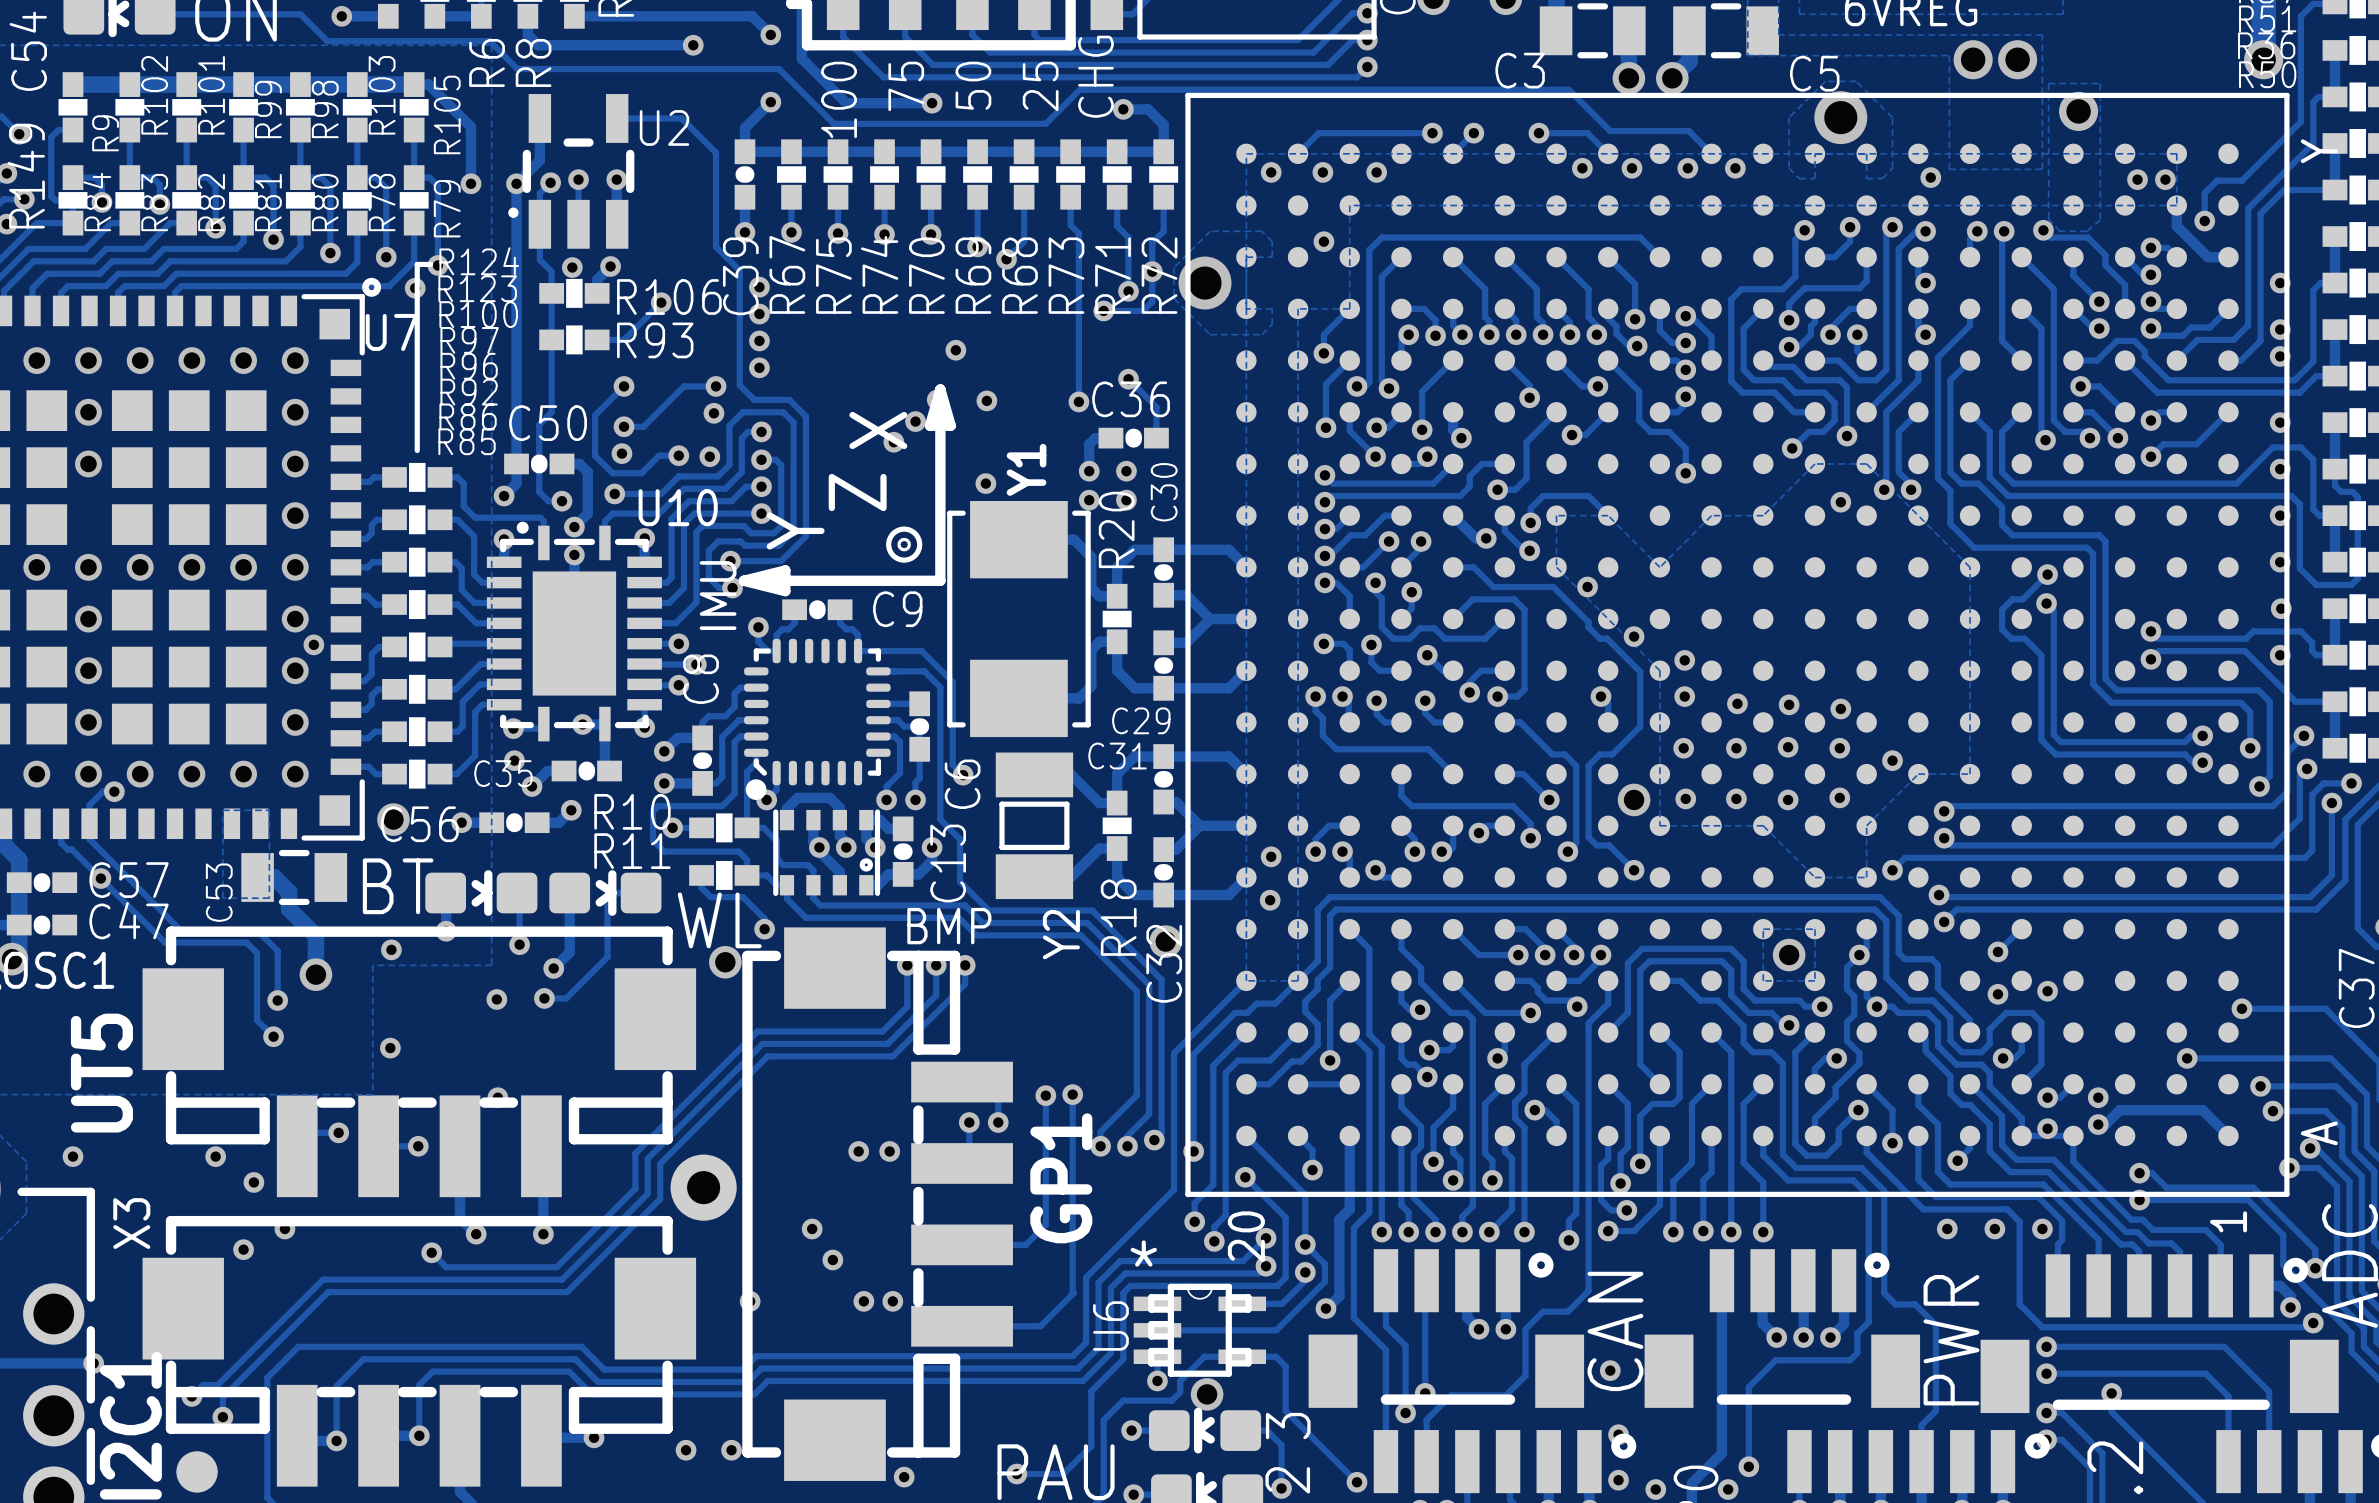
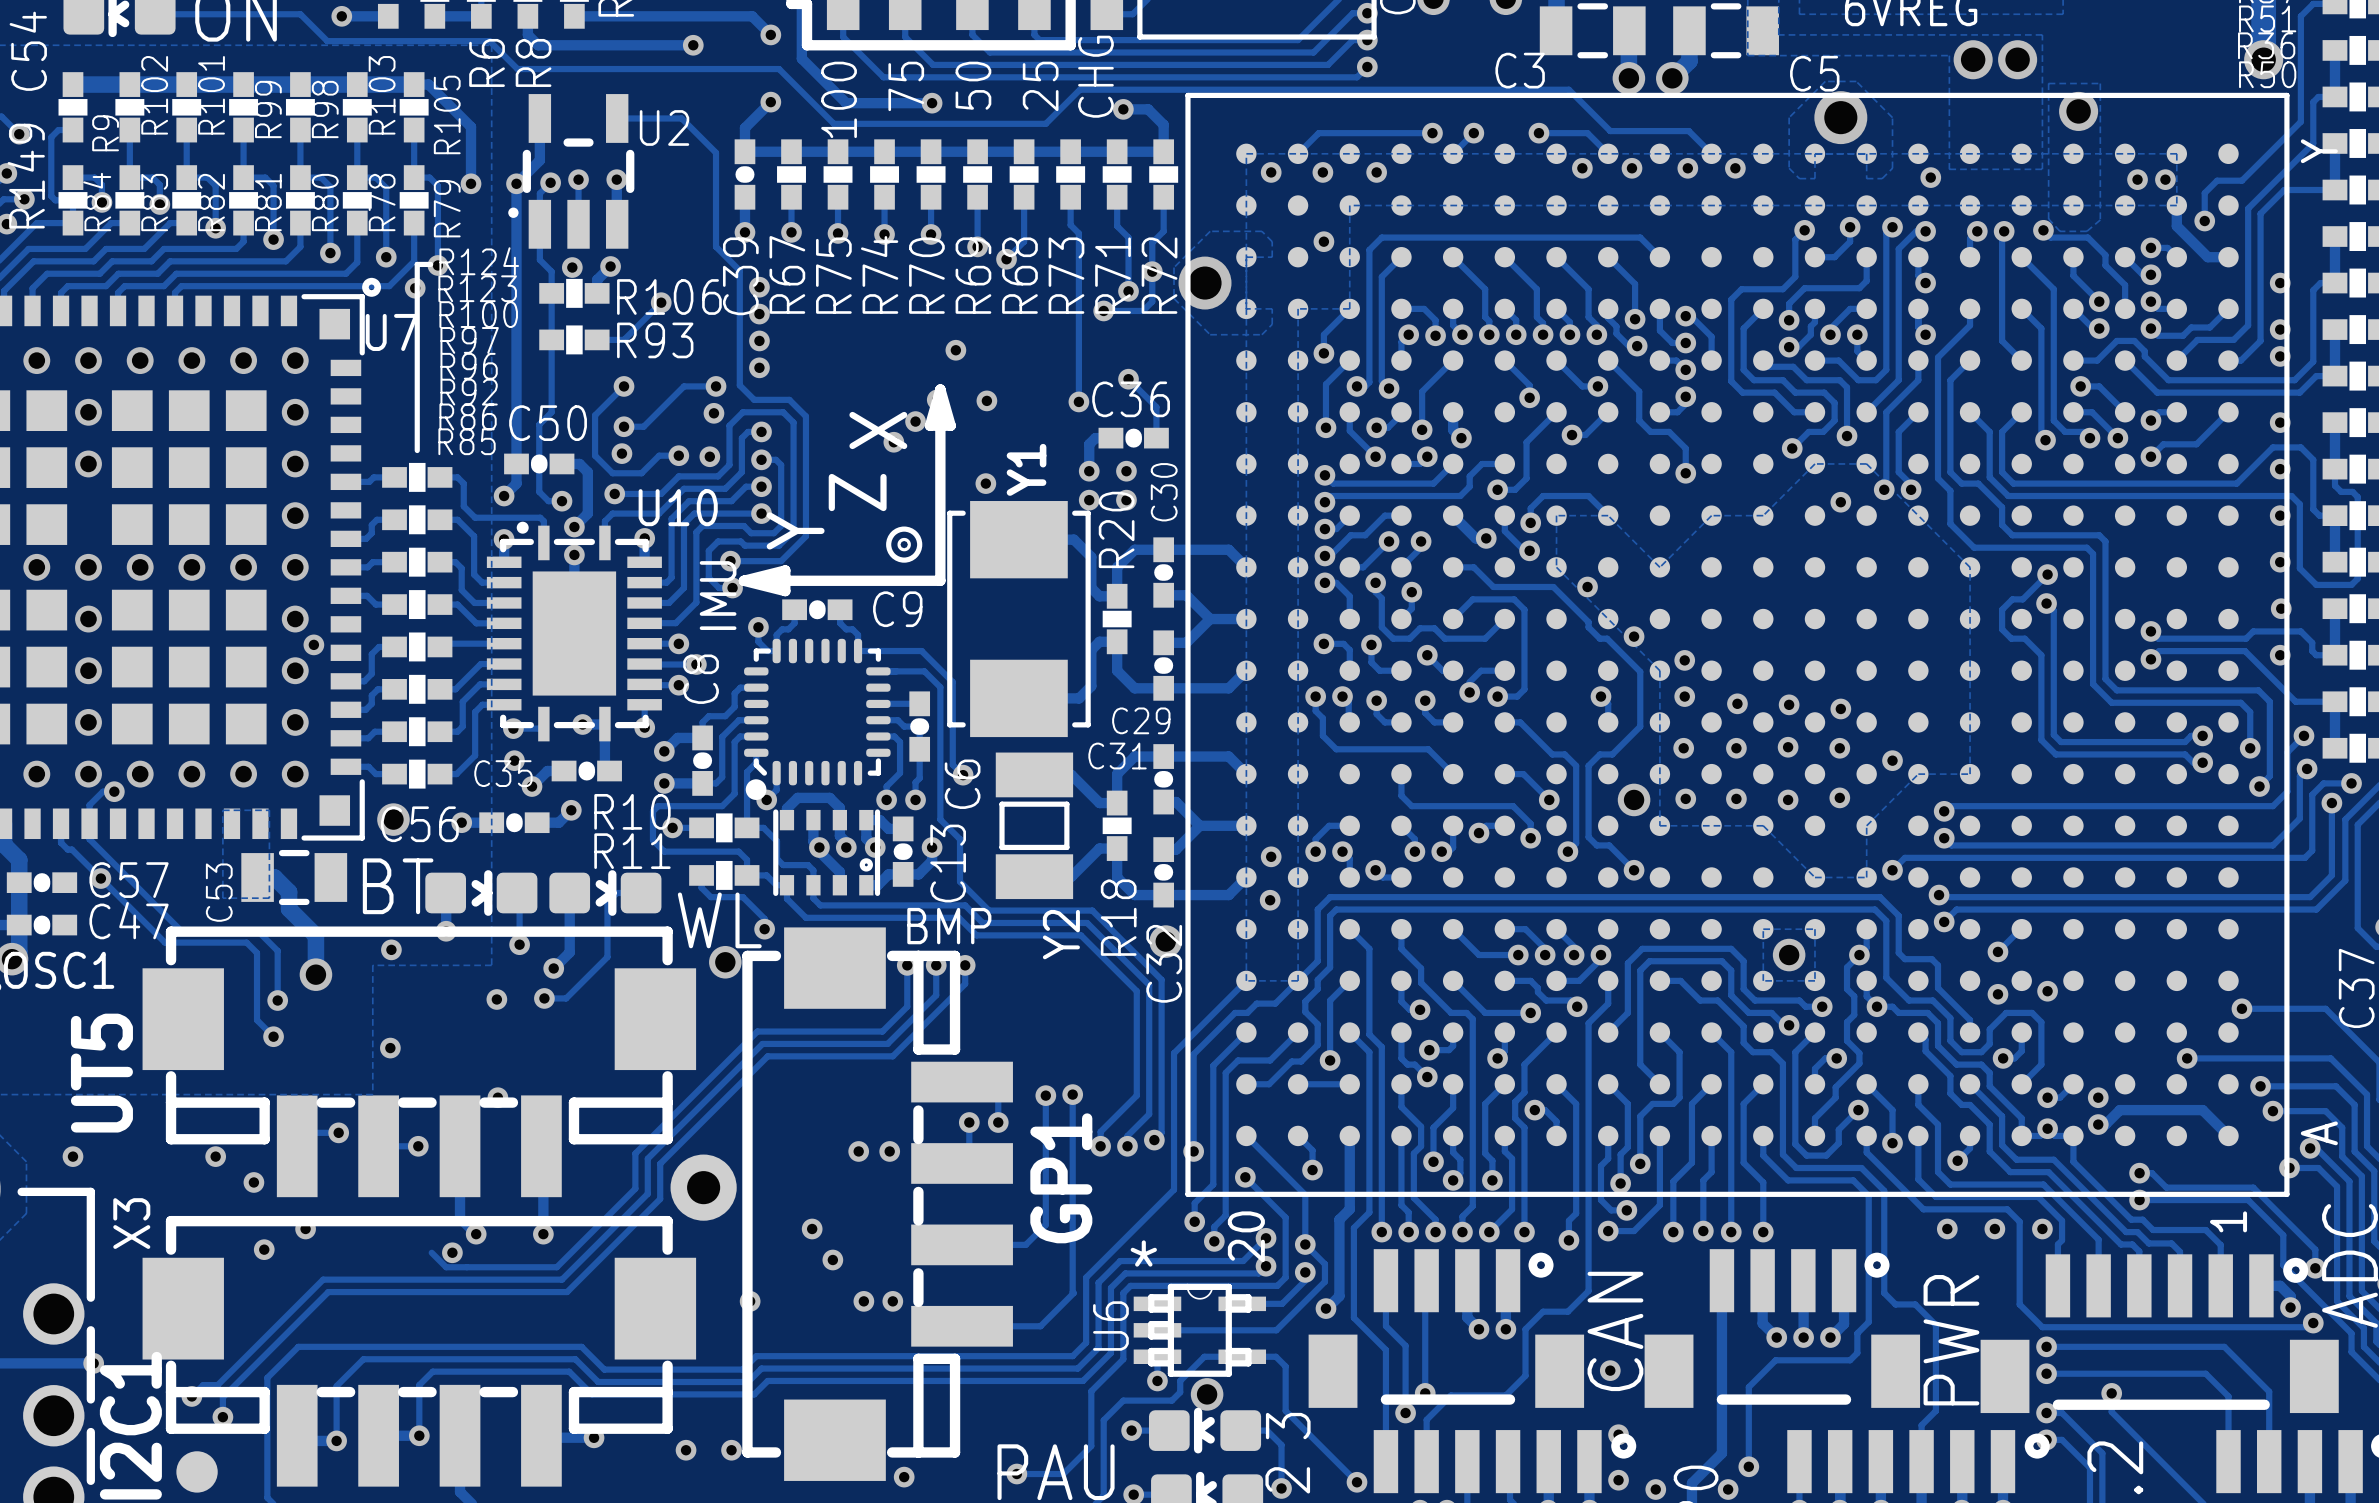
via position: (284, 1228) -> (305, 1228)
via: (243, 1249) -> none
via: none -> (264, 1249)
via position: (431, 1252) -> (452, 1252)

